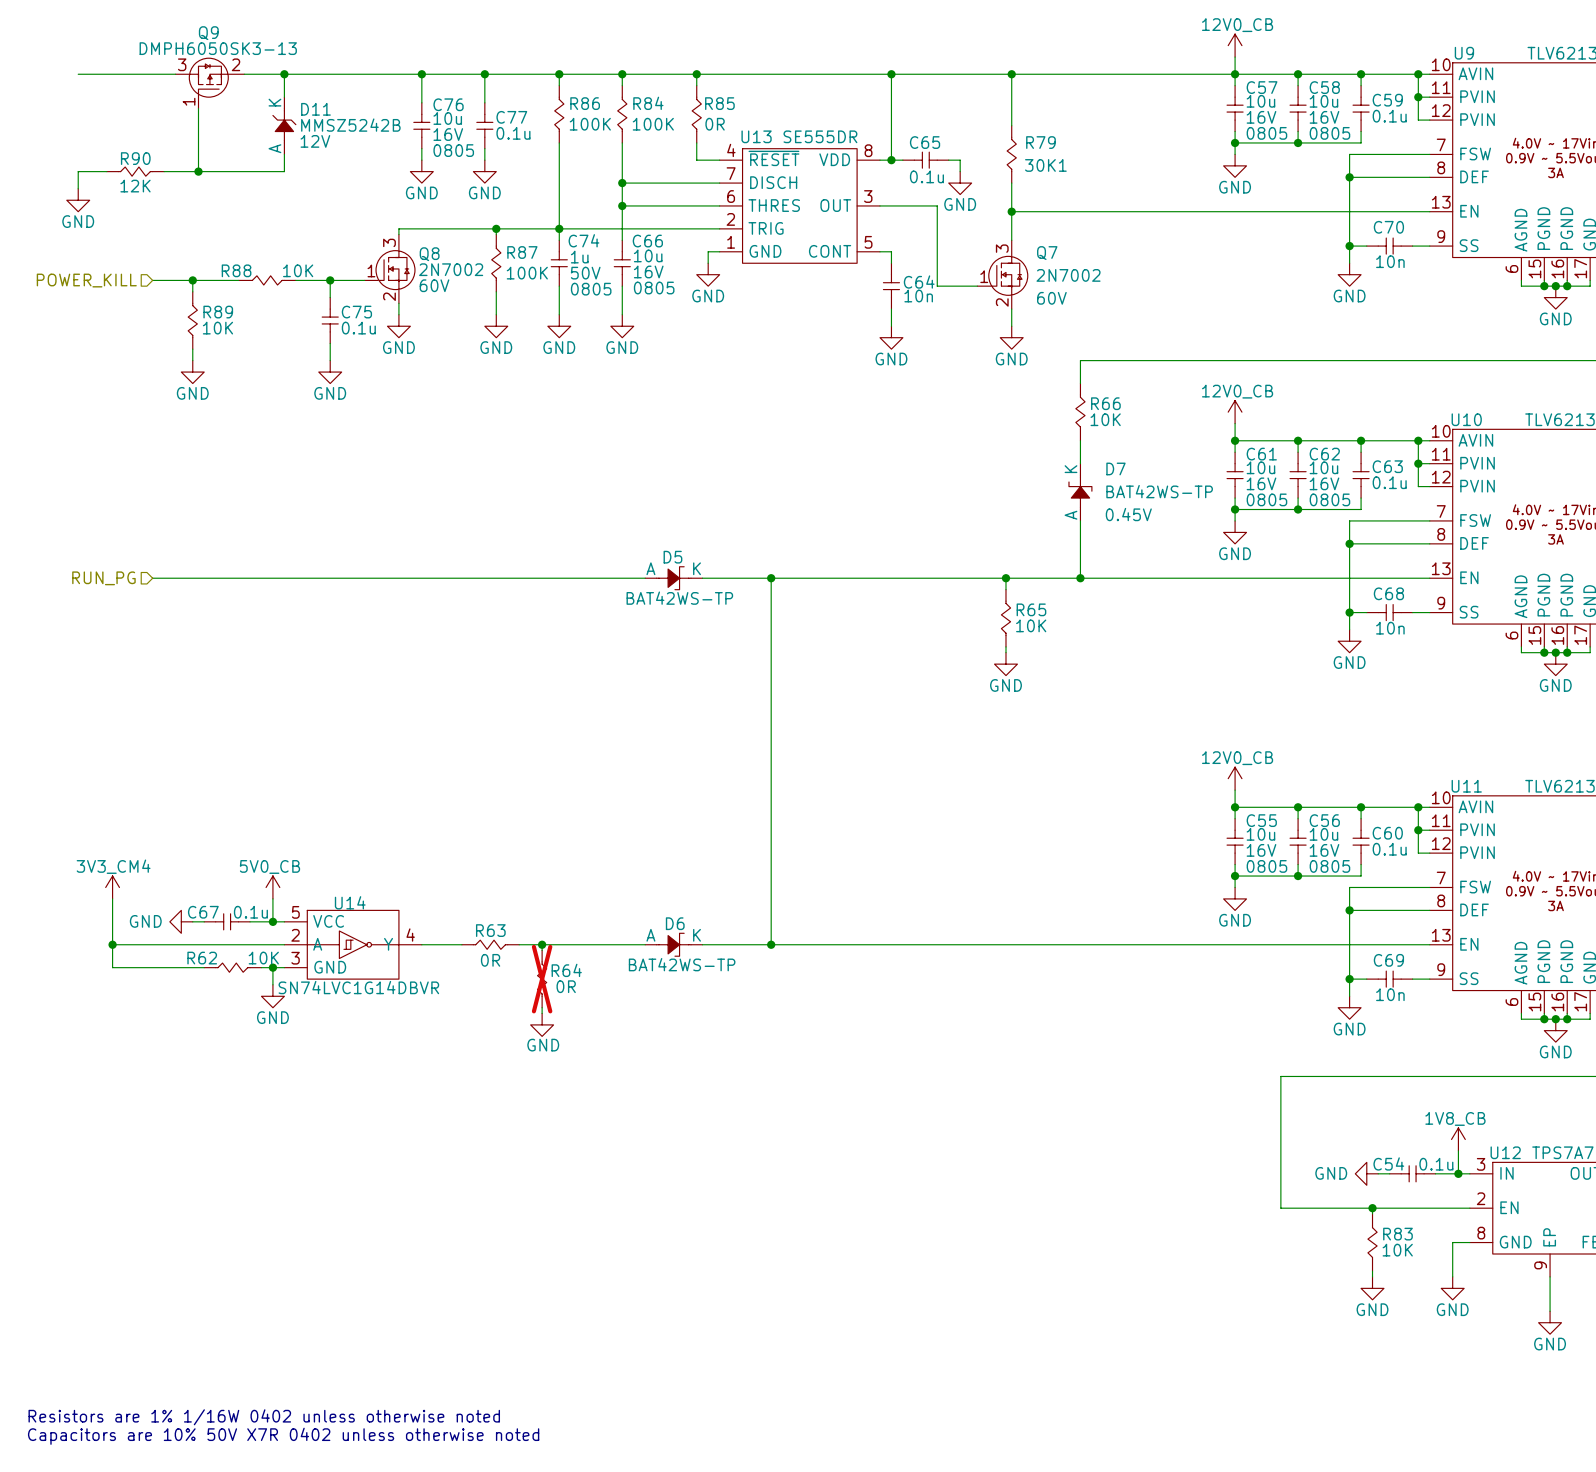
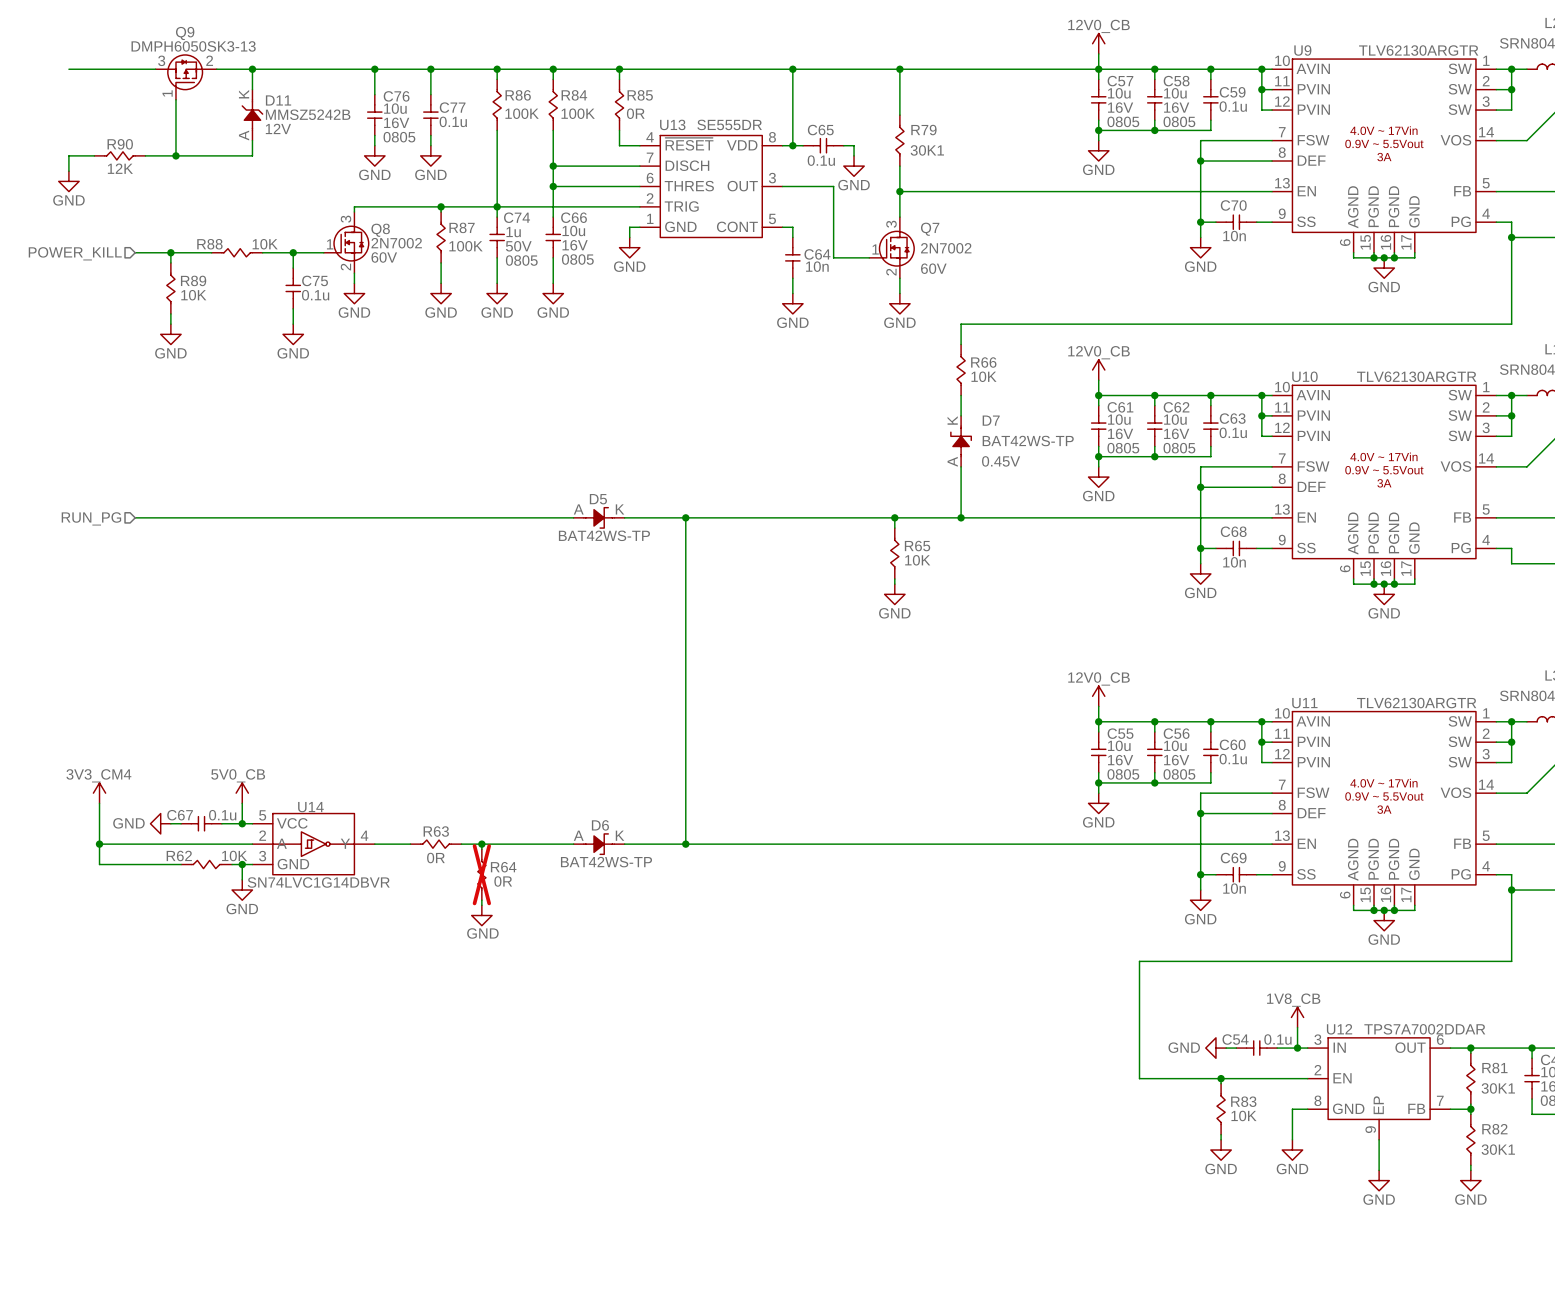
text: Resistors are 1% 1/16W 0402 unless otherwise noted (264, 1417) -> none
text: Capacitors are 10% 50V X7R 0402 unless otherwise noted (283, 1436) -> none

